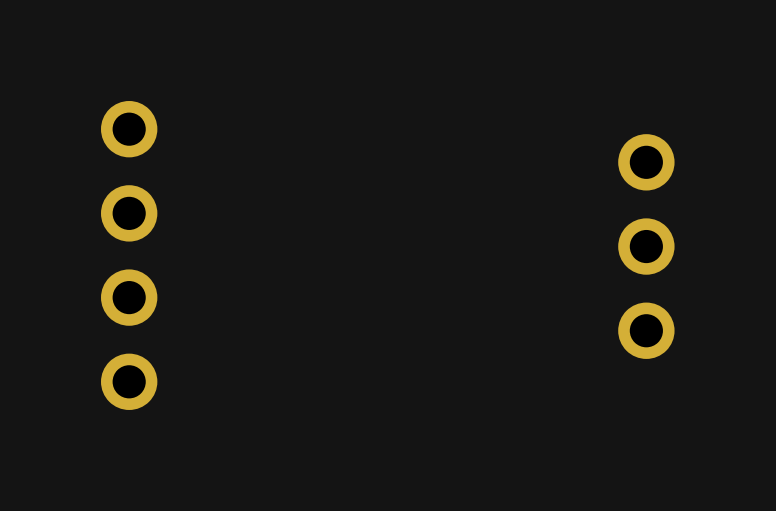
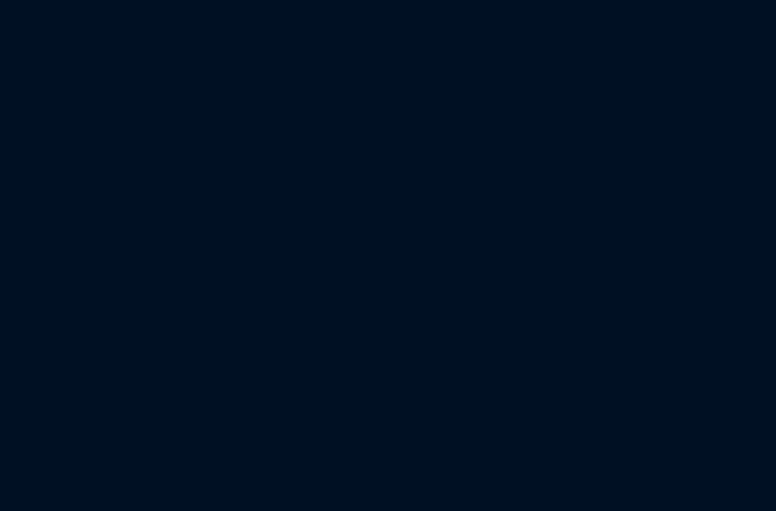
part: (646, 246) -> none
part: (129, 255) -> none

